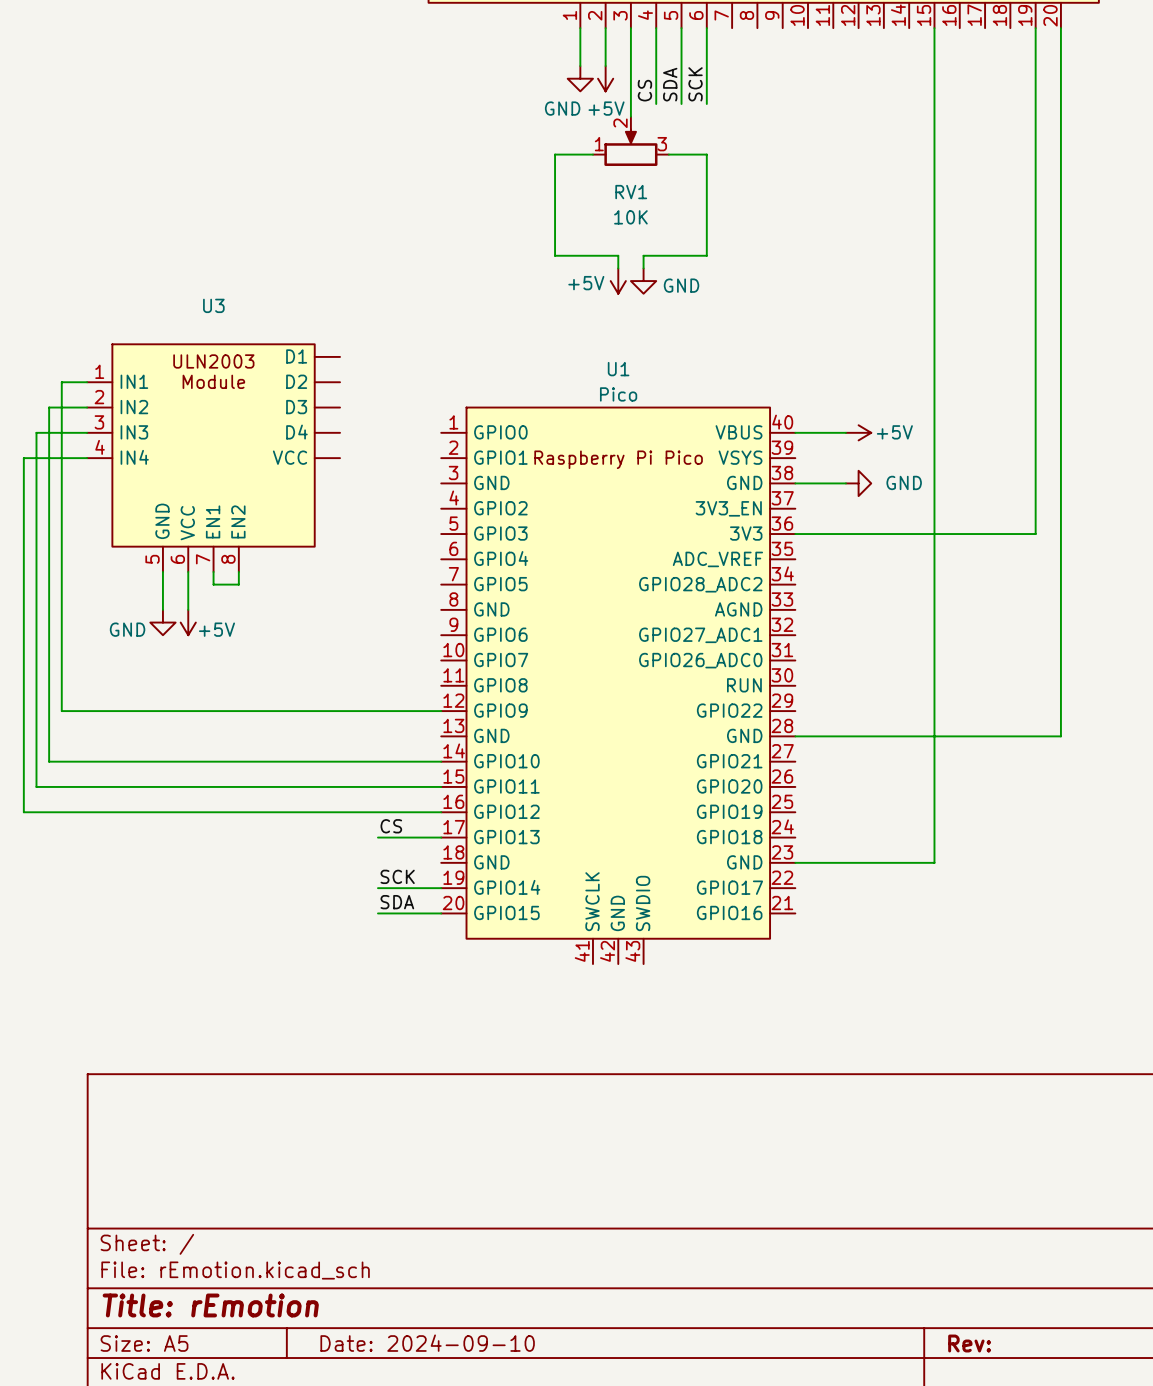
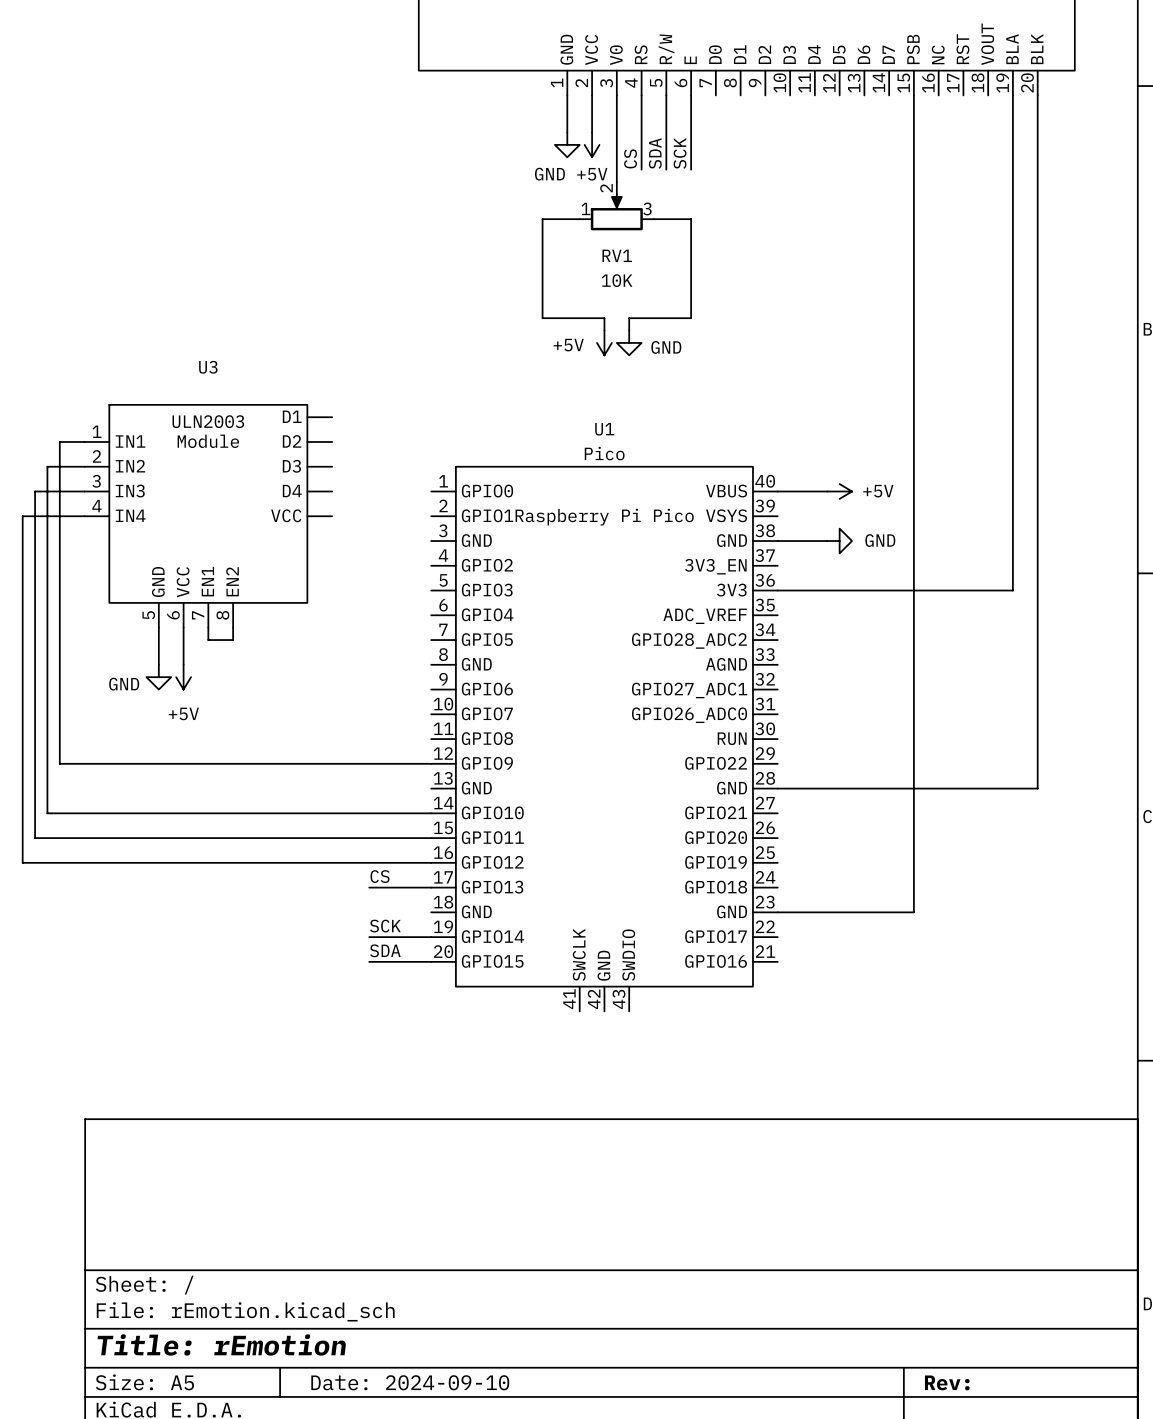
power symbol text position: +5V (216, 629) -> +5V (183, 713)

